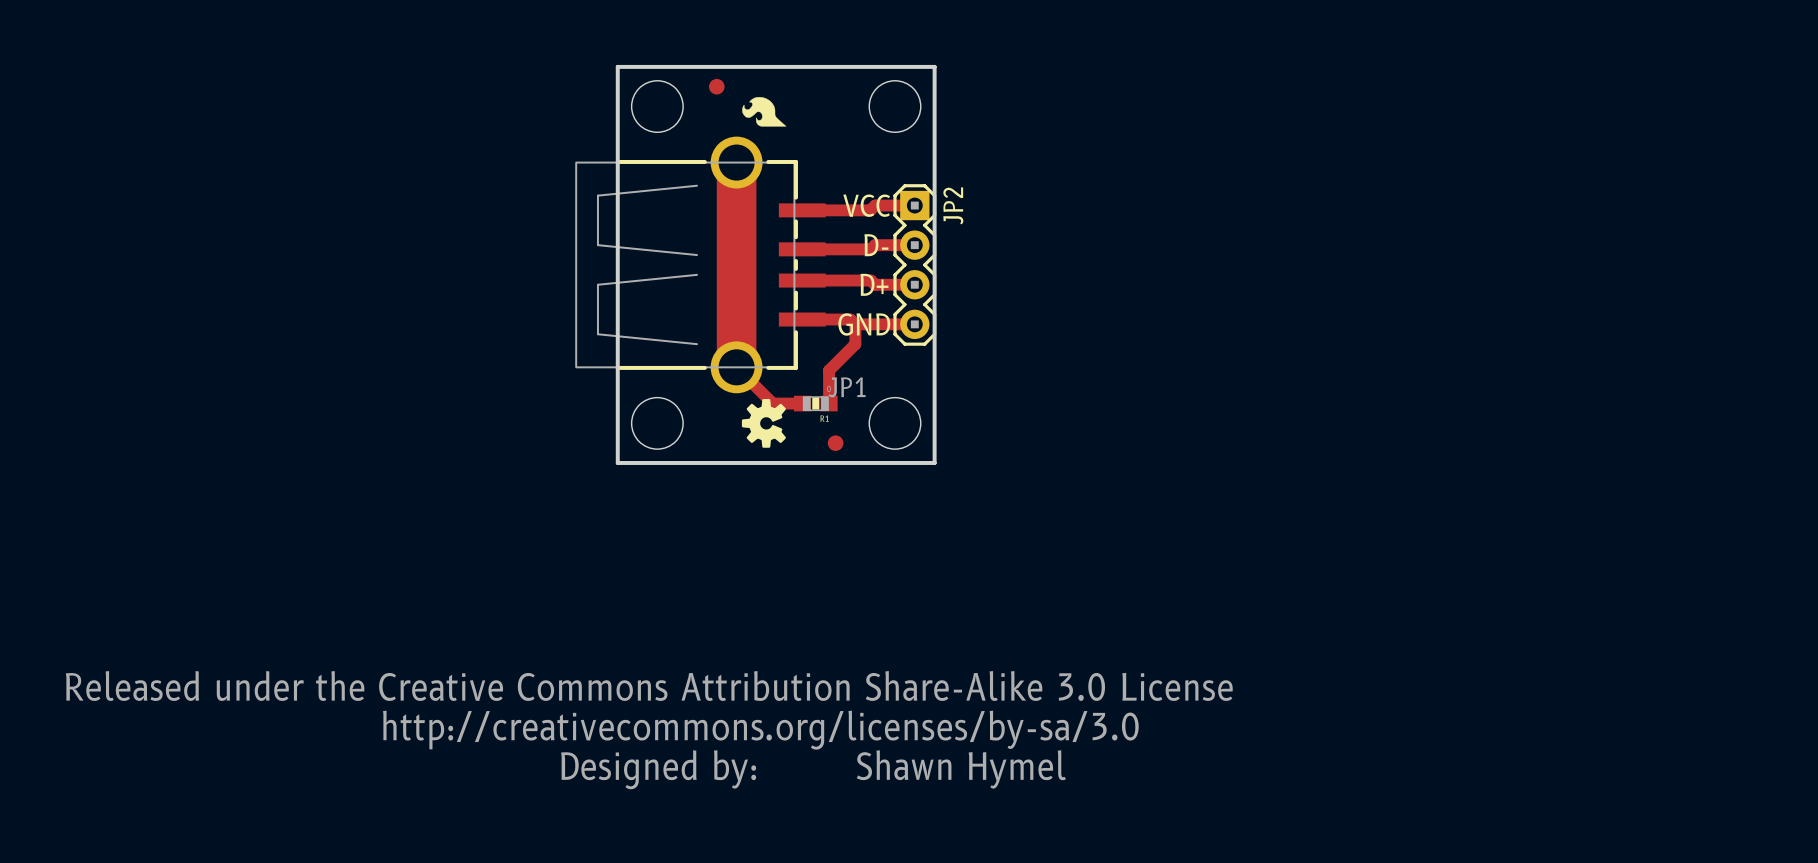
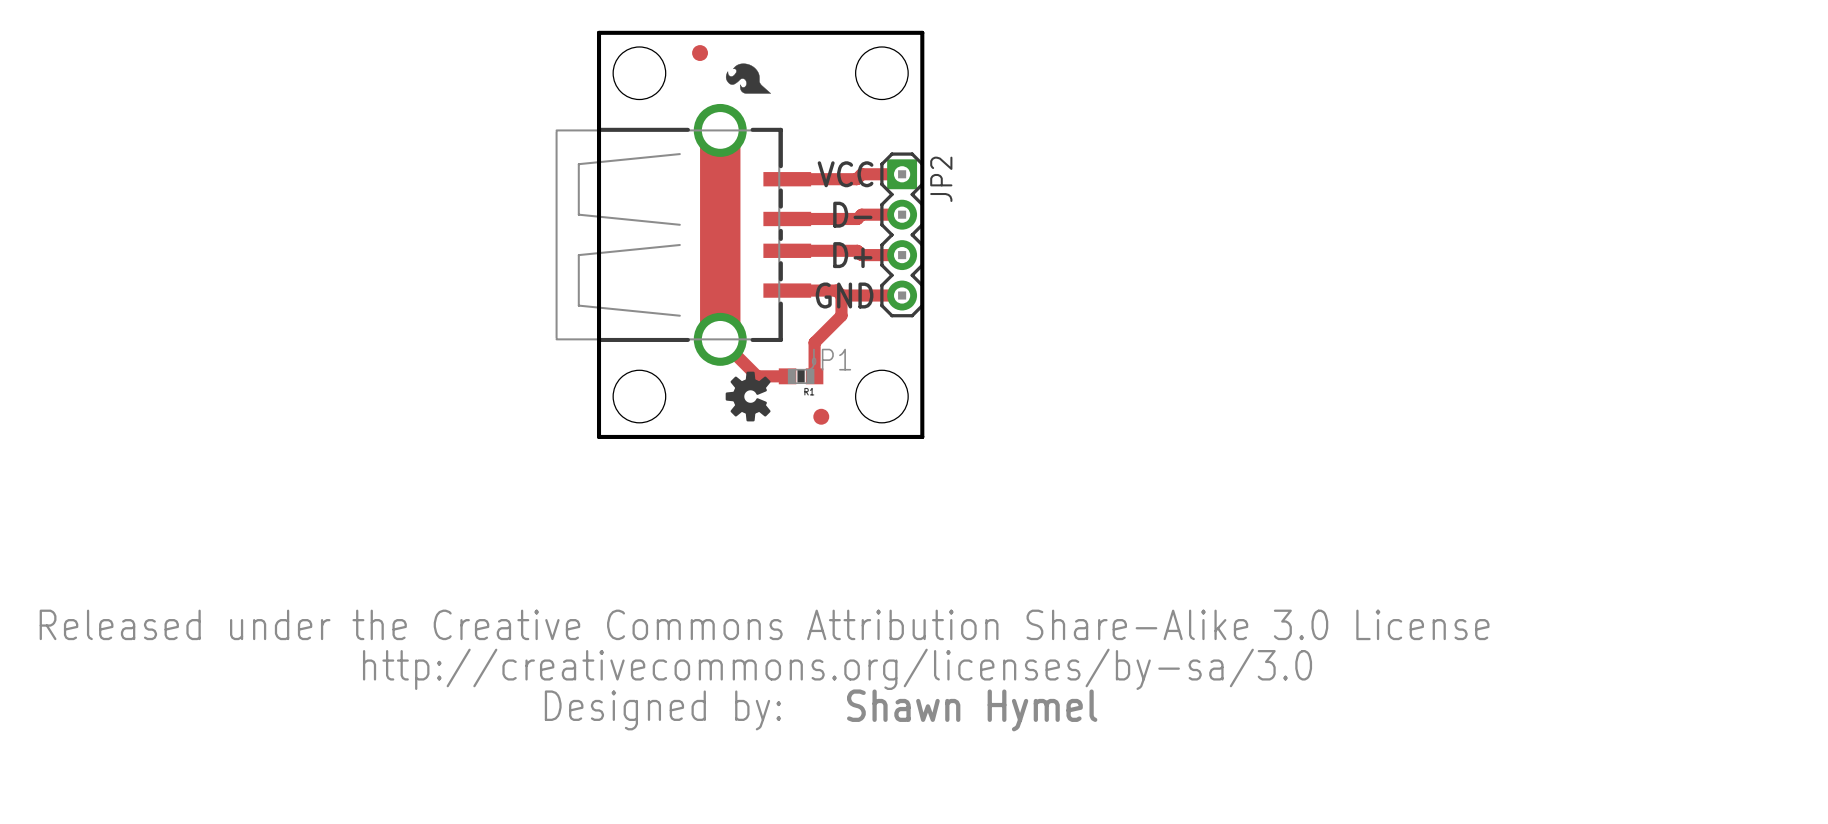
drawing position: (649, 730) -> (764, 670)
text position: Shawn Hymel (961, 769) -> Shawn Hymel (972, 710)

